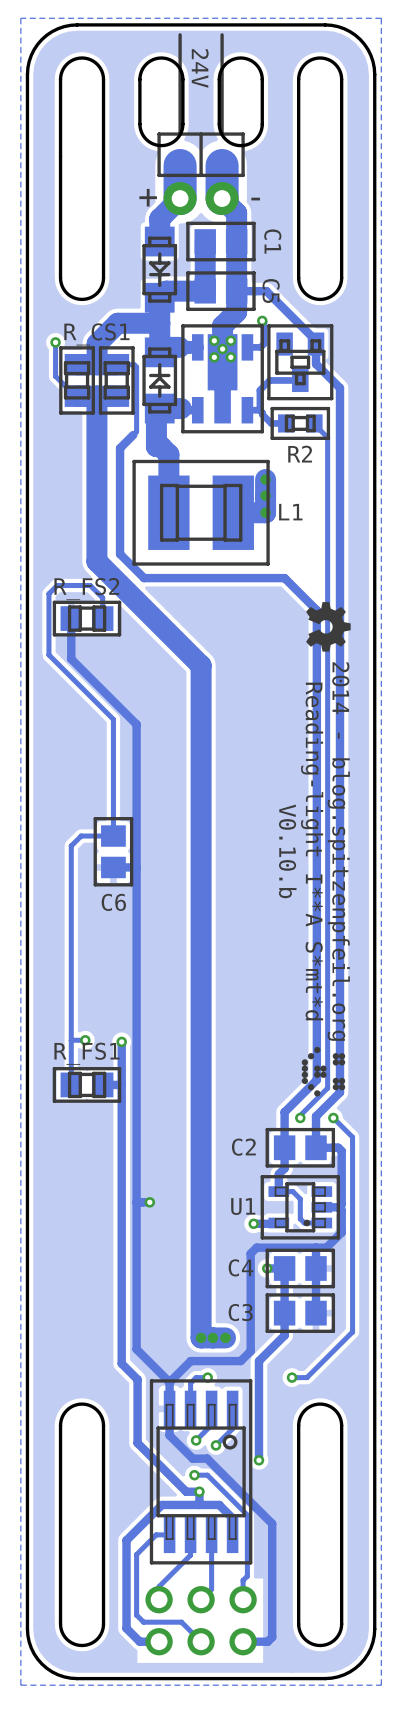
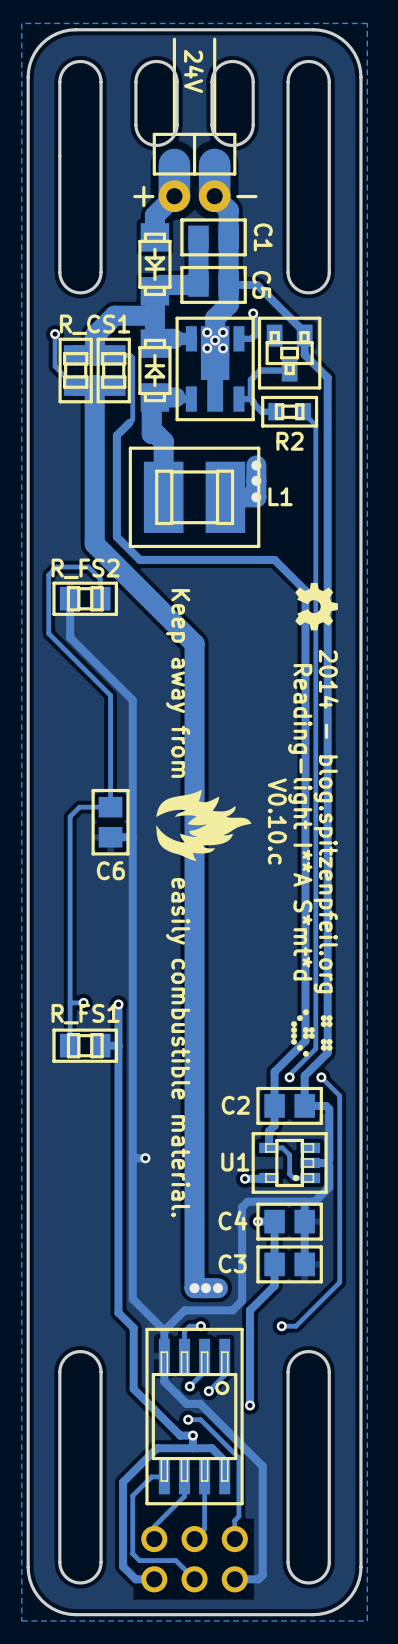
drawing: none -> [156, 789, 252, 862]
text: V0.10.b (287, 851) -> V0.10.c (277, 821)
text: none -> Keep away from easily combustible material. (178, 903)

